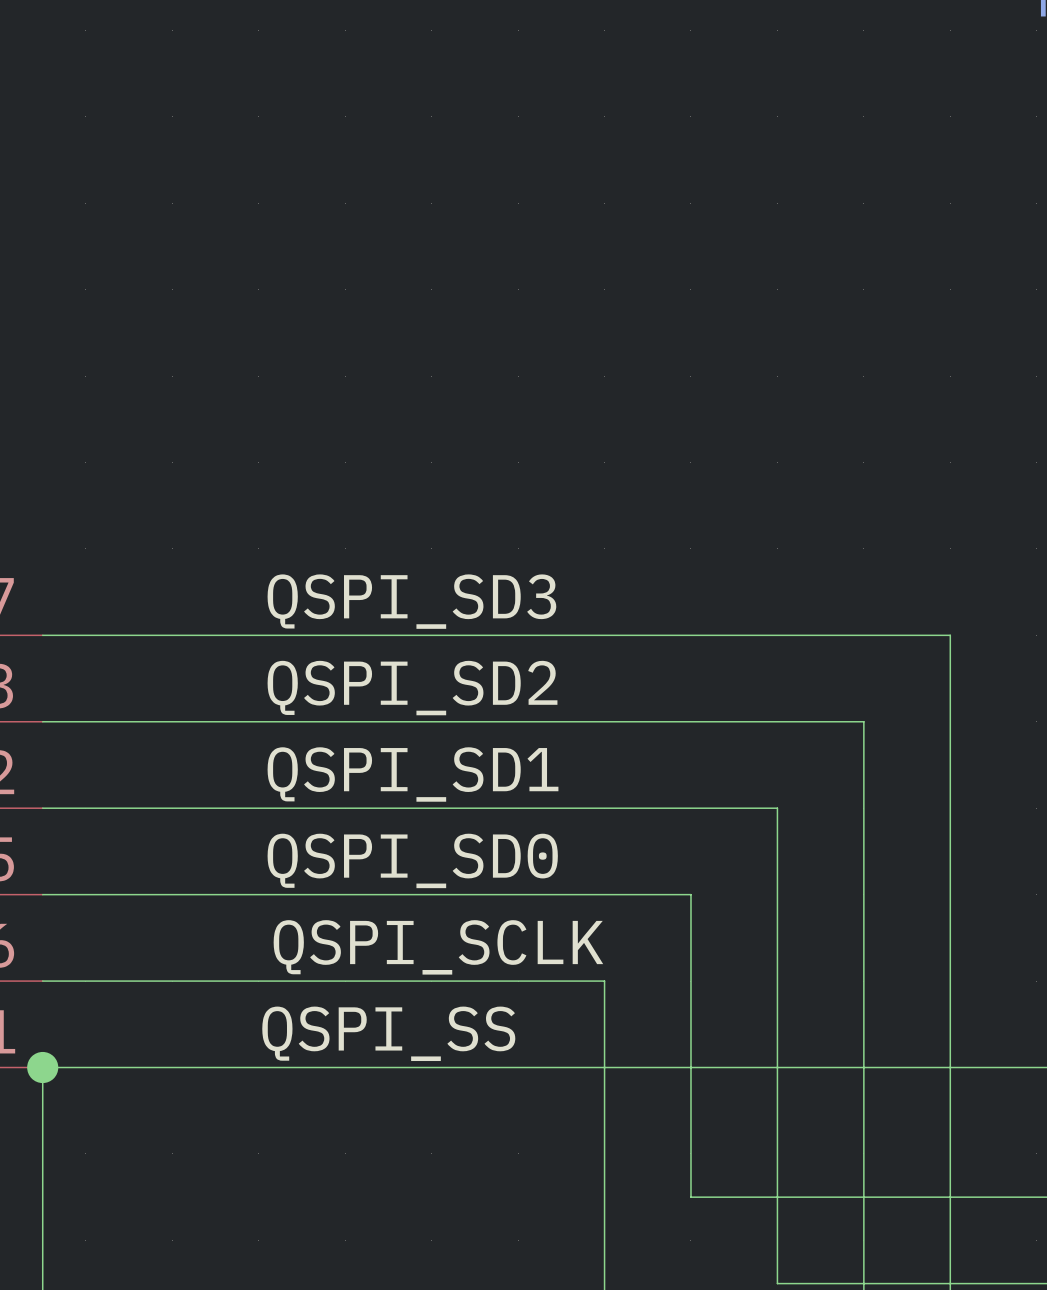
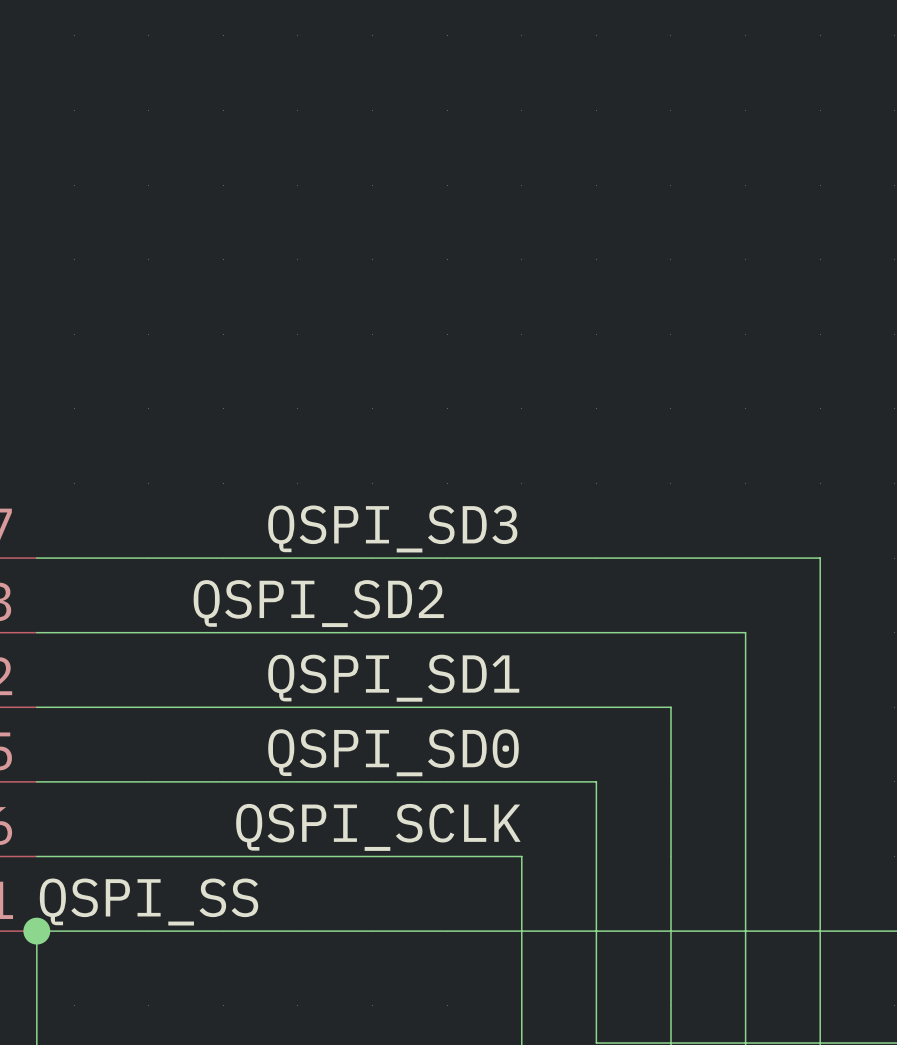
label position: QSPI_SD3 (411, 601) -> QSPI_SD3 (392, 528)
label position: QSPI_SD2 (412, 688) -> QSPI_SD2 (318, 603)
label position: QSPI_SD1 (413, 774) -> QSPI_SD1 (393, 678)
label position: QSPI_SD0 (412, 860) -> QSPI_SD0 (393, 752)
label position: QSPI_SS (388, 1033) -> QSPI_SS (149, 902)

